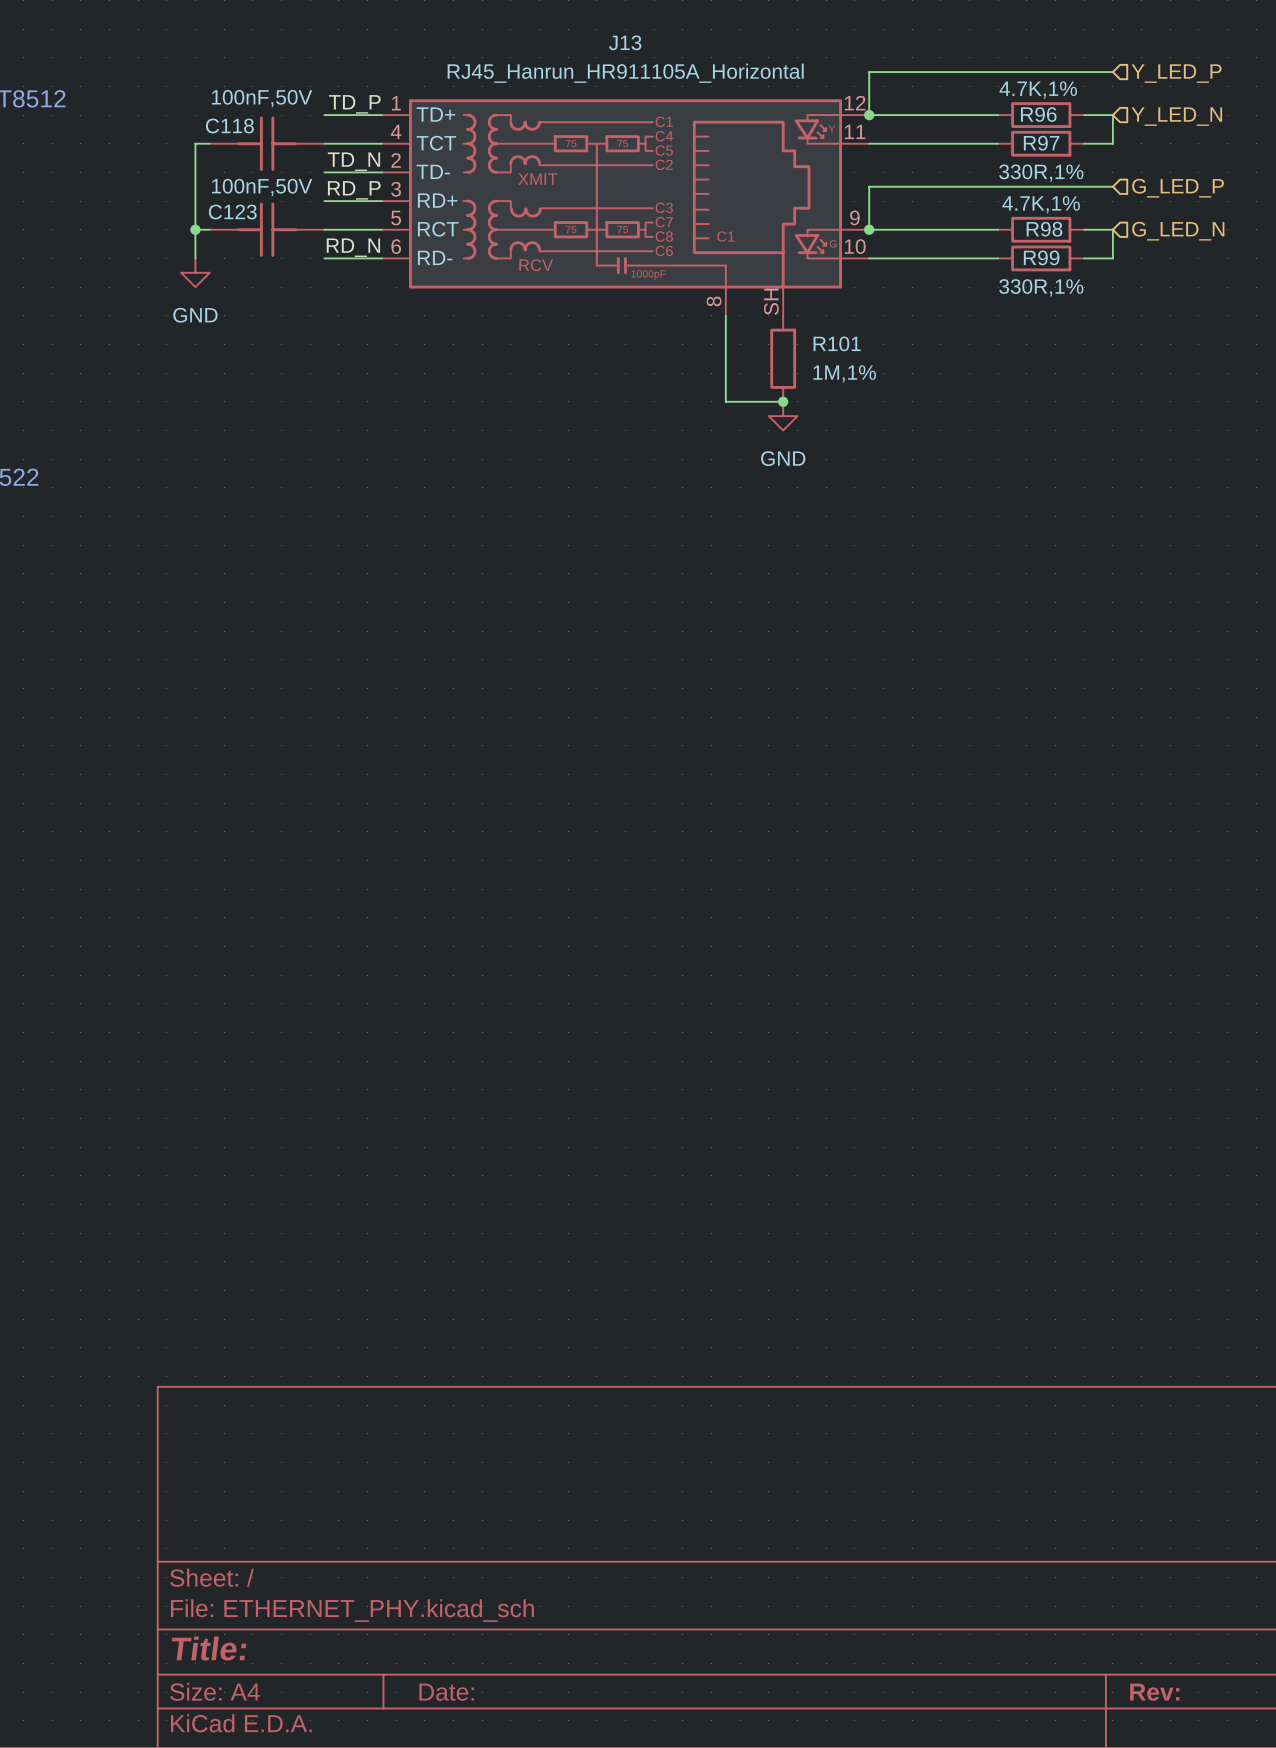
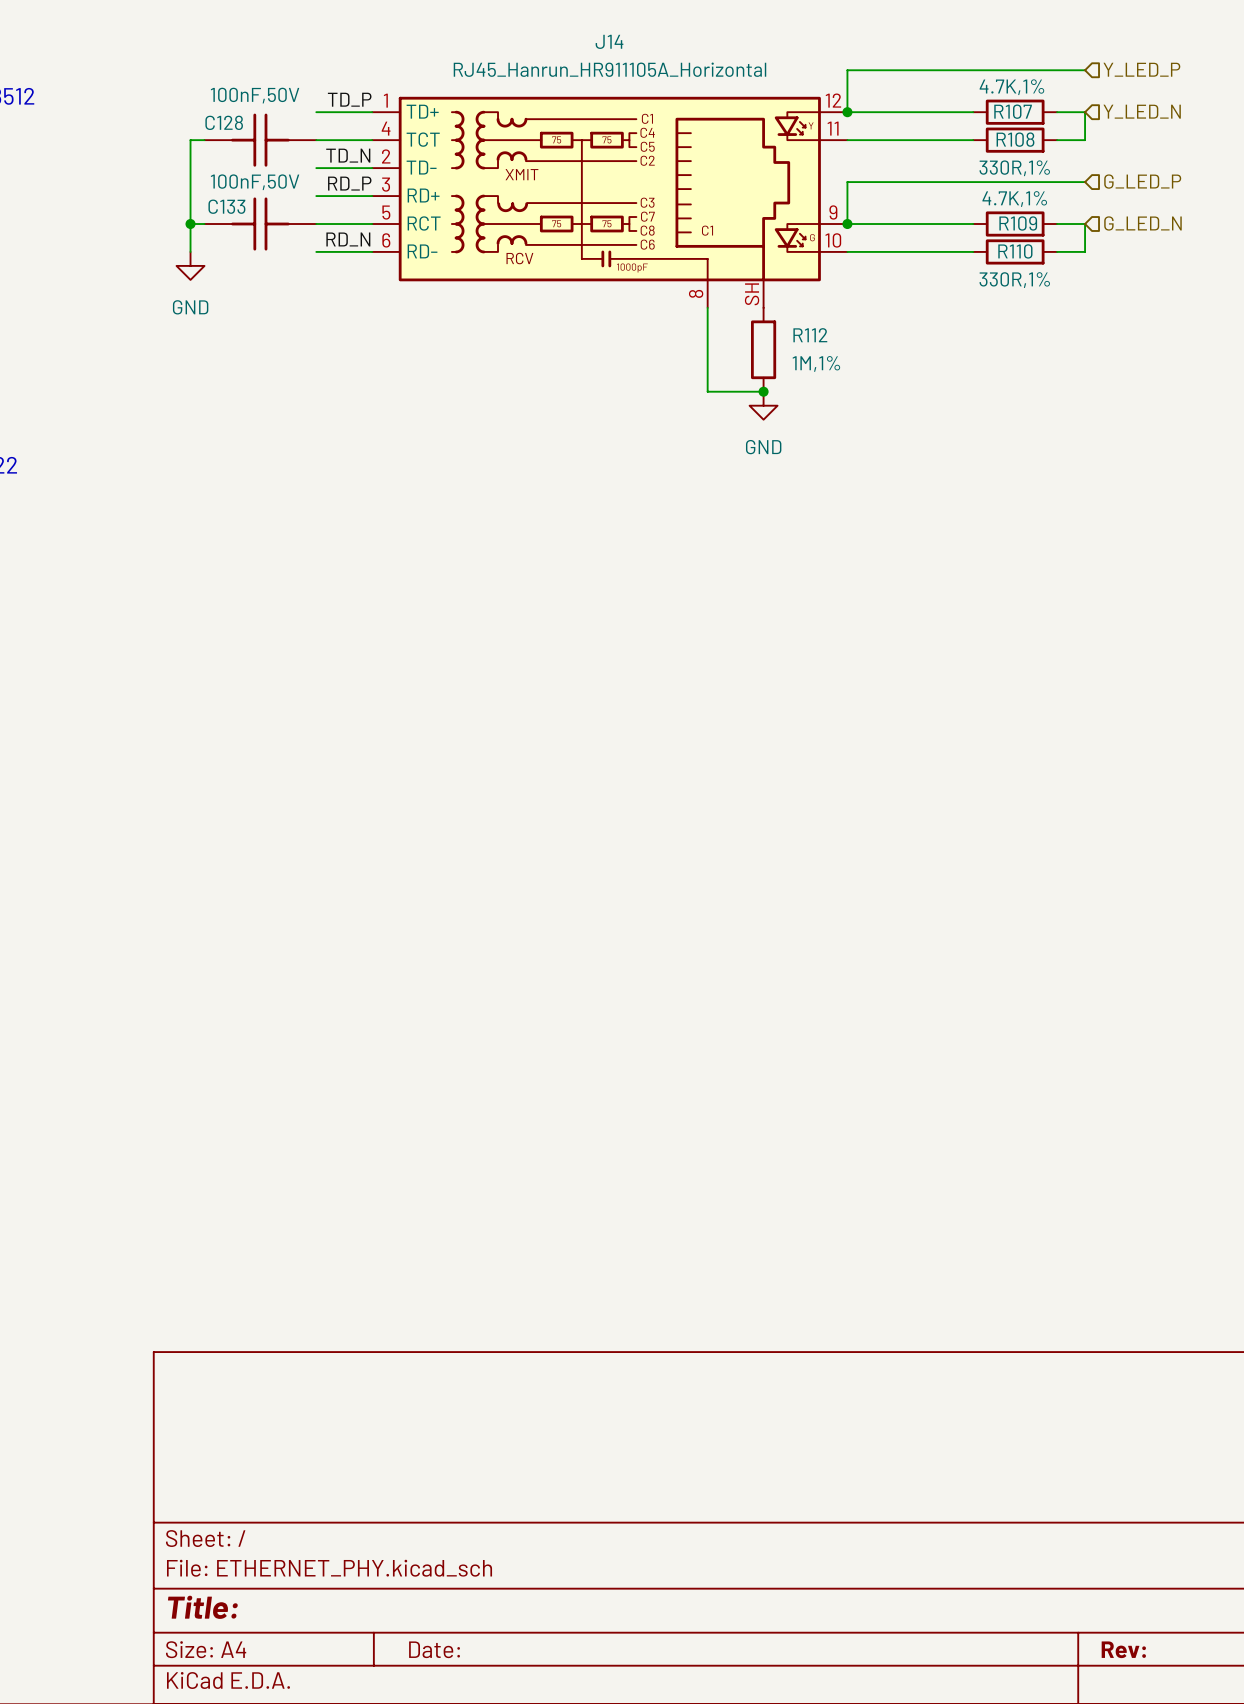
J13 name: J13 (625, 42) -> J14 (609, 41)
R96 name: R96 (1038, 114) -> R107 (1013, 111)
C118 name: C118 (229, 125) -> C128 (224, 122)
R97 name: R97 (1041, 143) -> R108 (1015, 139)
C123 name: C123 (232, 212) -> C133 (226, 206)
R98 name: R98 (1044, 229) -> R109 (1018, 223)
R99 name: R99 (1041, 257) -> R110 (1015, 251)
R101 name: R101 (837, 343) -> R112 (810, 335)

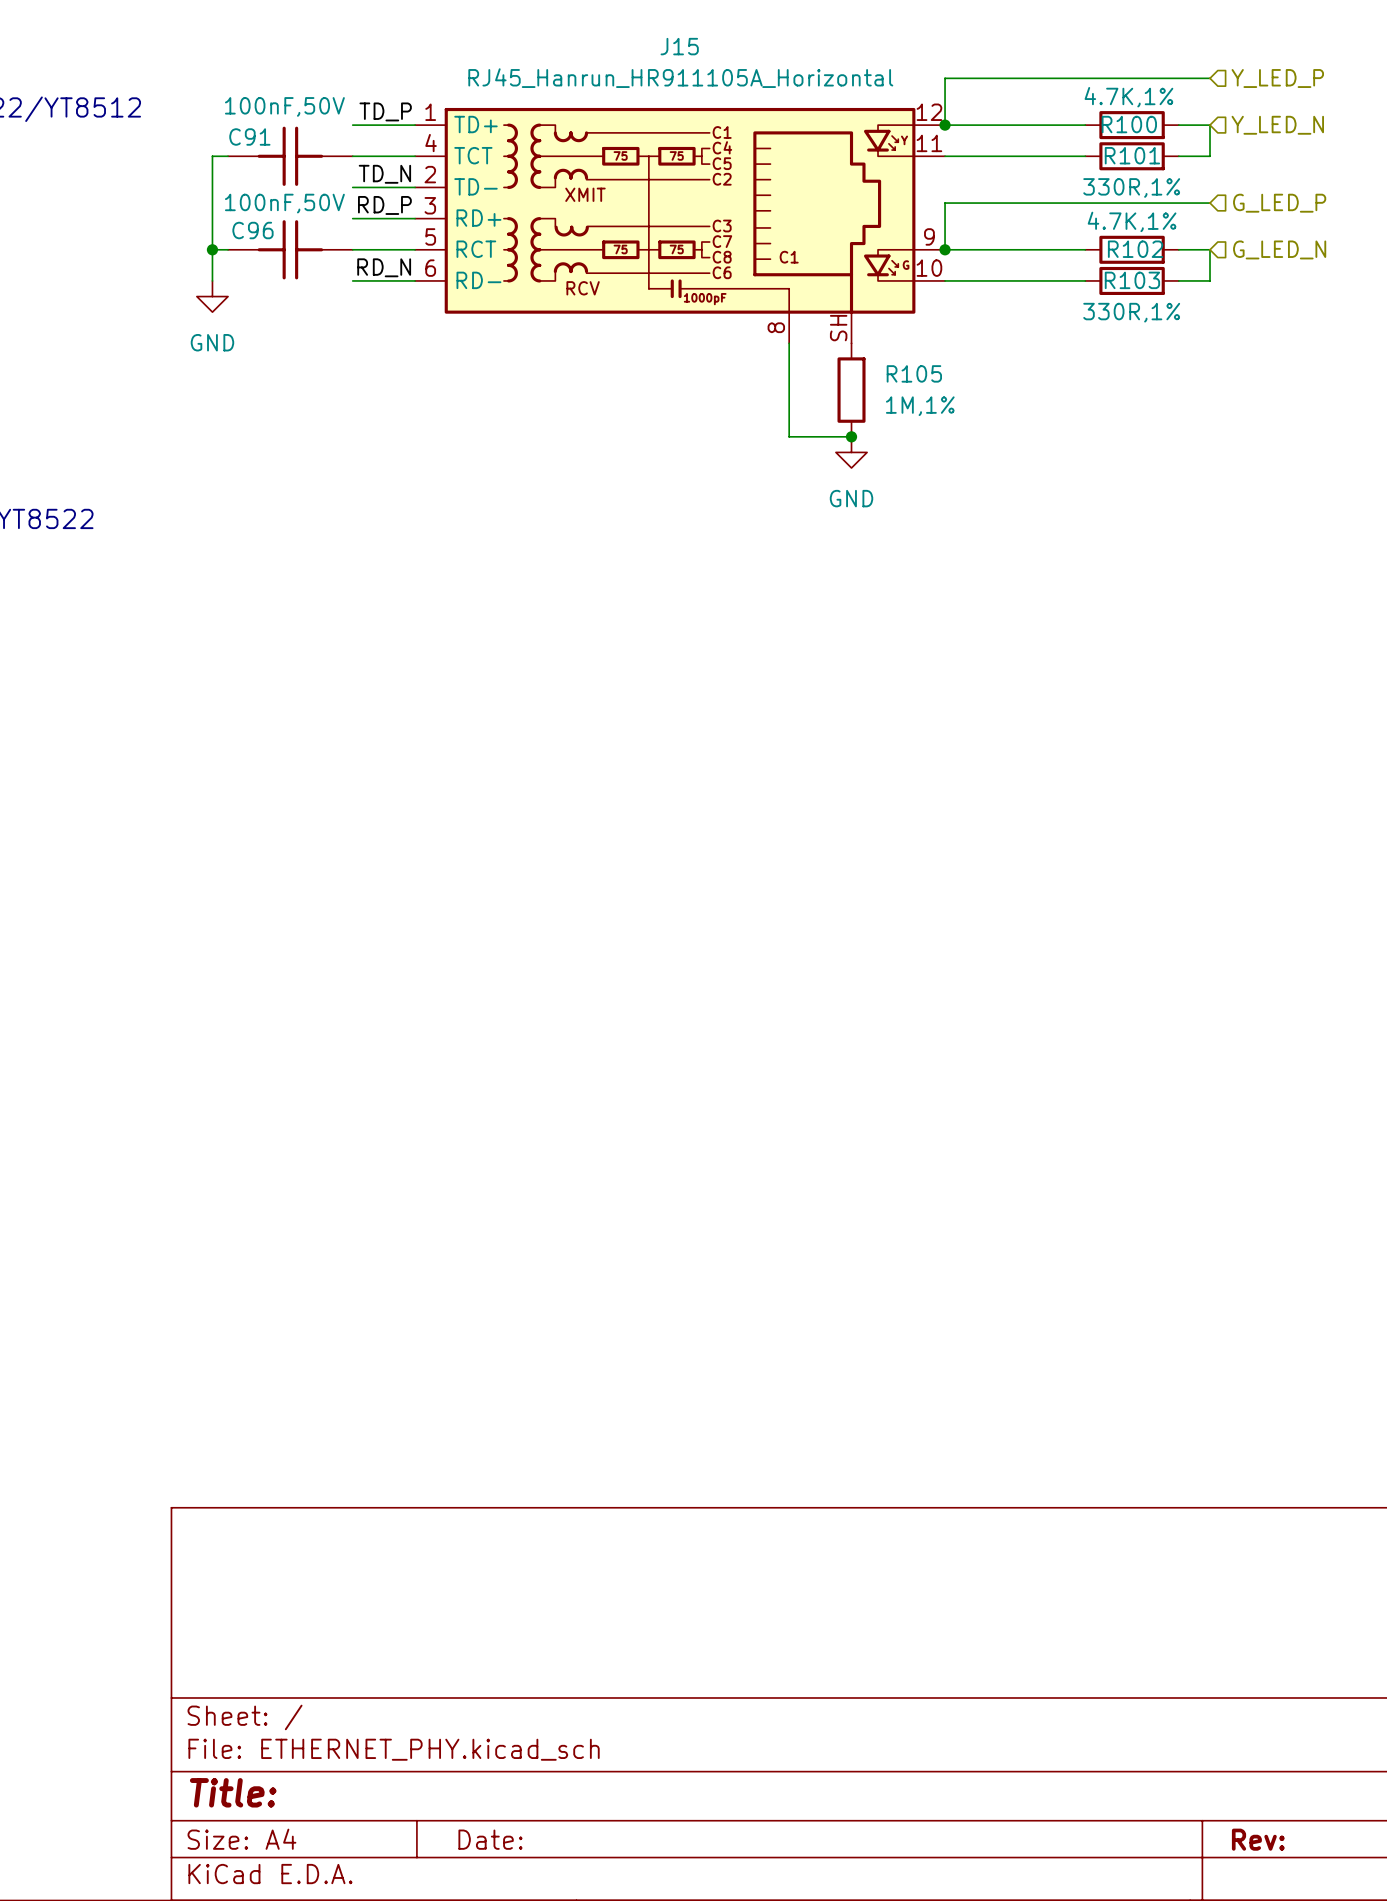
J14 name: J14 (609, 41) -> J15 (679, 46)
R107 name: R107 (1013, 111) -> R100 (1129, 124)
C128 name: C128 (224, 122) -> C91 (249, 136)
R108 name: R108 (1015, 139) -> R101 (1132, 155)
C133 name: C133 (226, 206) -> C96 (252, 230)
R109 name: R109 (1018, 223) -> R102 (1135, 249)
R110 name: R110 (1015, 251) -> R103 (1132, 280)
R112 name: R112 (810, 335) -> R105 (914, 373)

